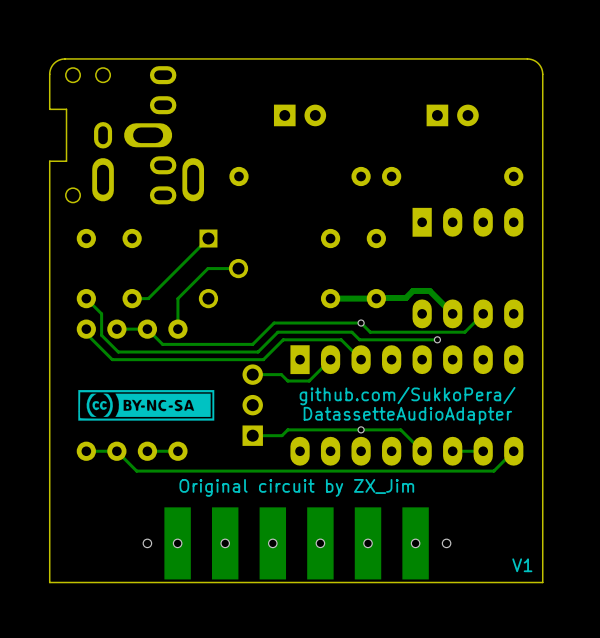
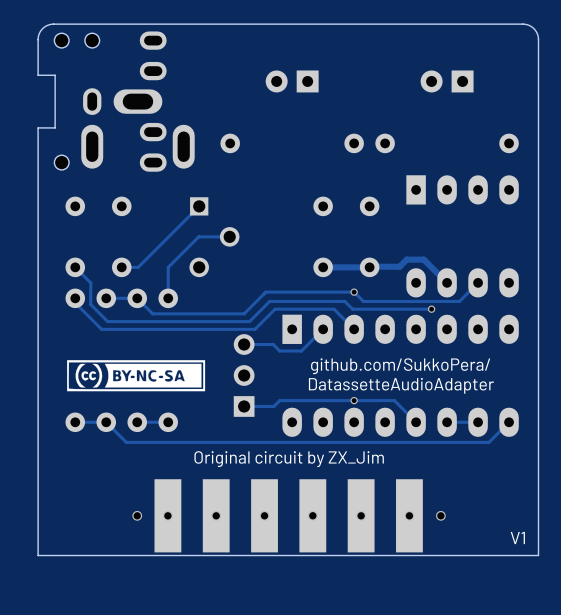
part rotation: 0° (300, 115) -> 180° (292, 81)
part rotation: 0° (452, 115) -> 180° (447, 81)

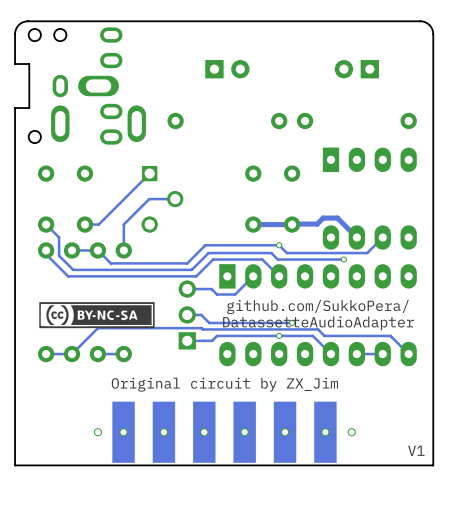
part rotation: 0° (292, 81) -> 180° (227, 69)
track: none -> (187, 314) (201, 314) (209, 322) (292, 322)
via: none -> (292, 322)
track: (509, 422) (488, 442) (126, 442) (106, 422) -> (408, 354) (390, 335) (324, 335) (318, 329) (201, 328) (97, 328) (72, 354)

